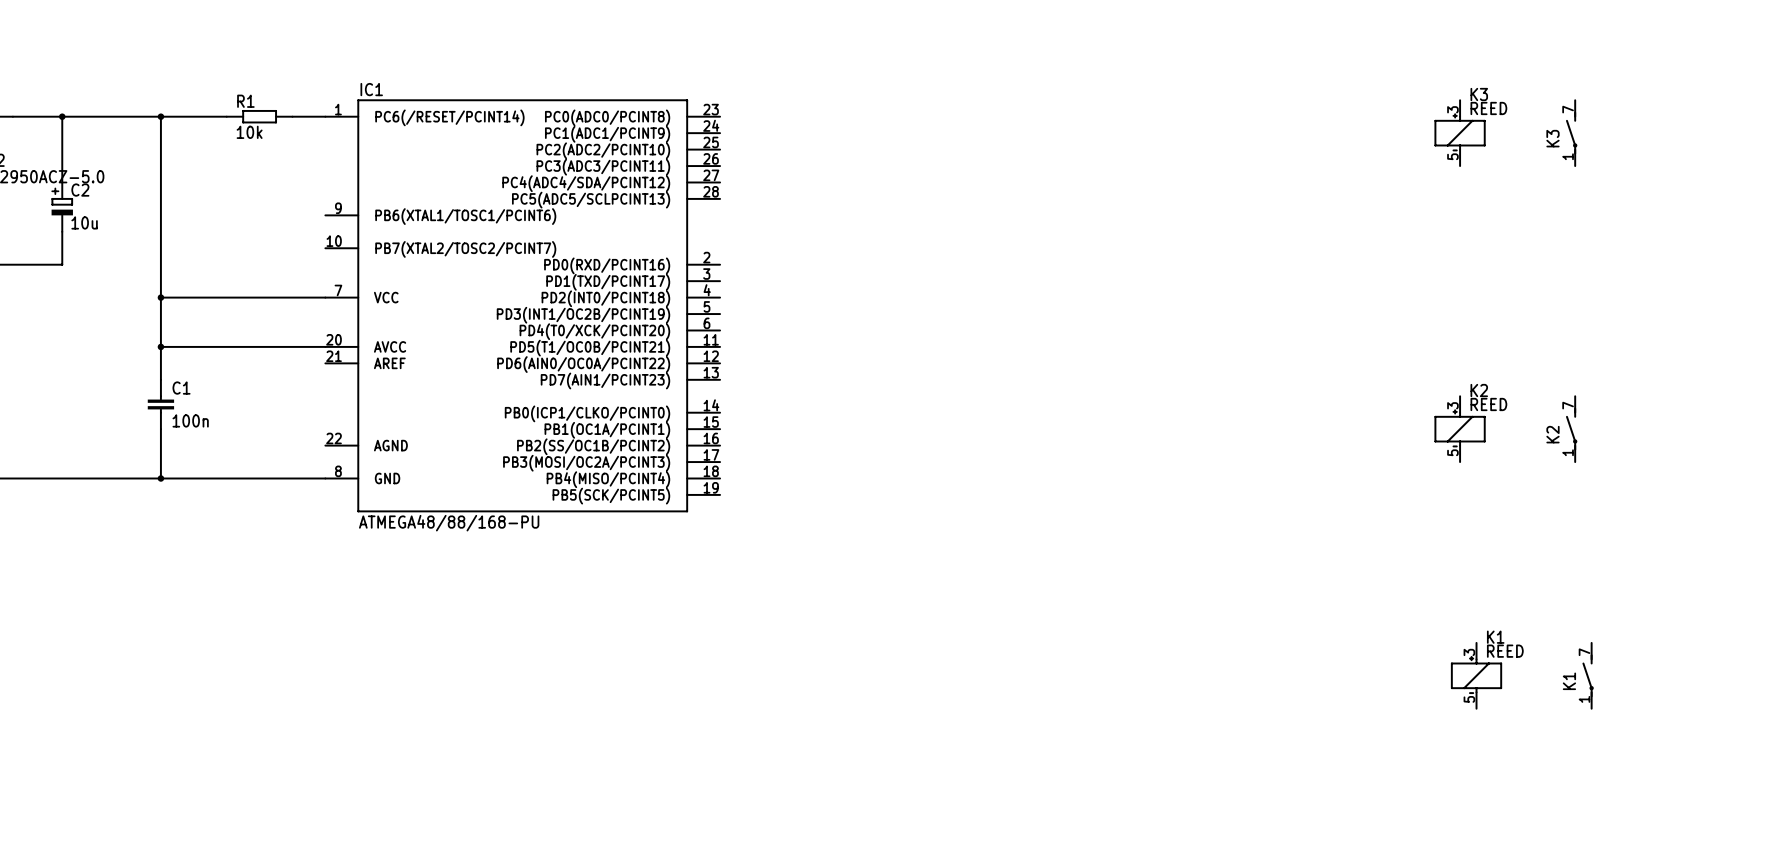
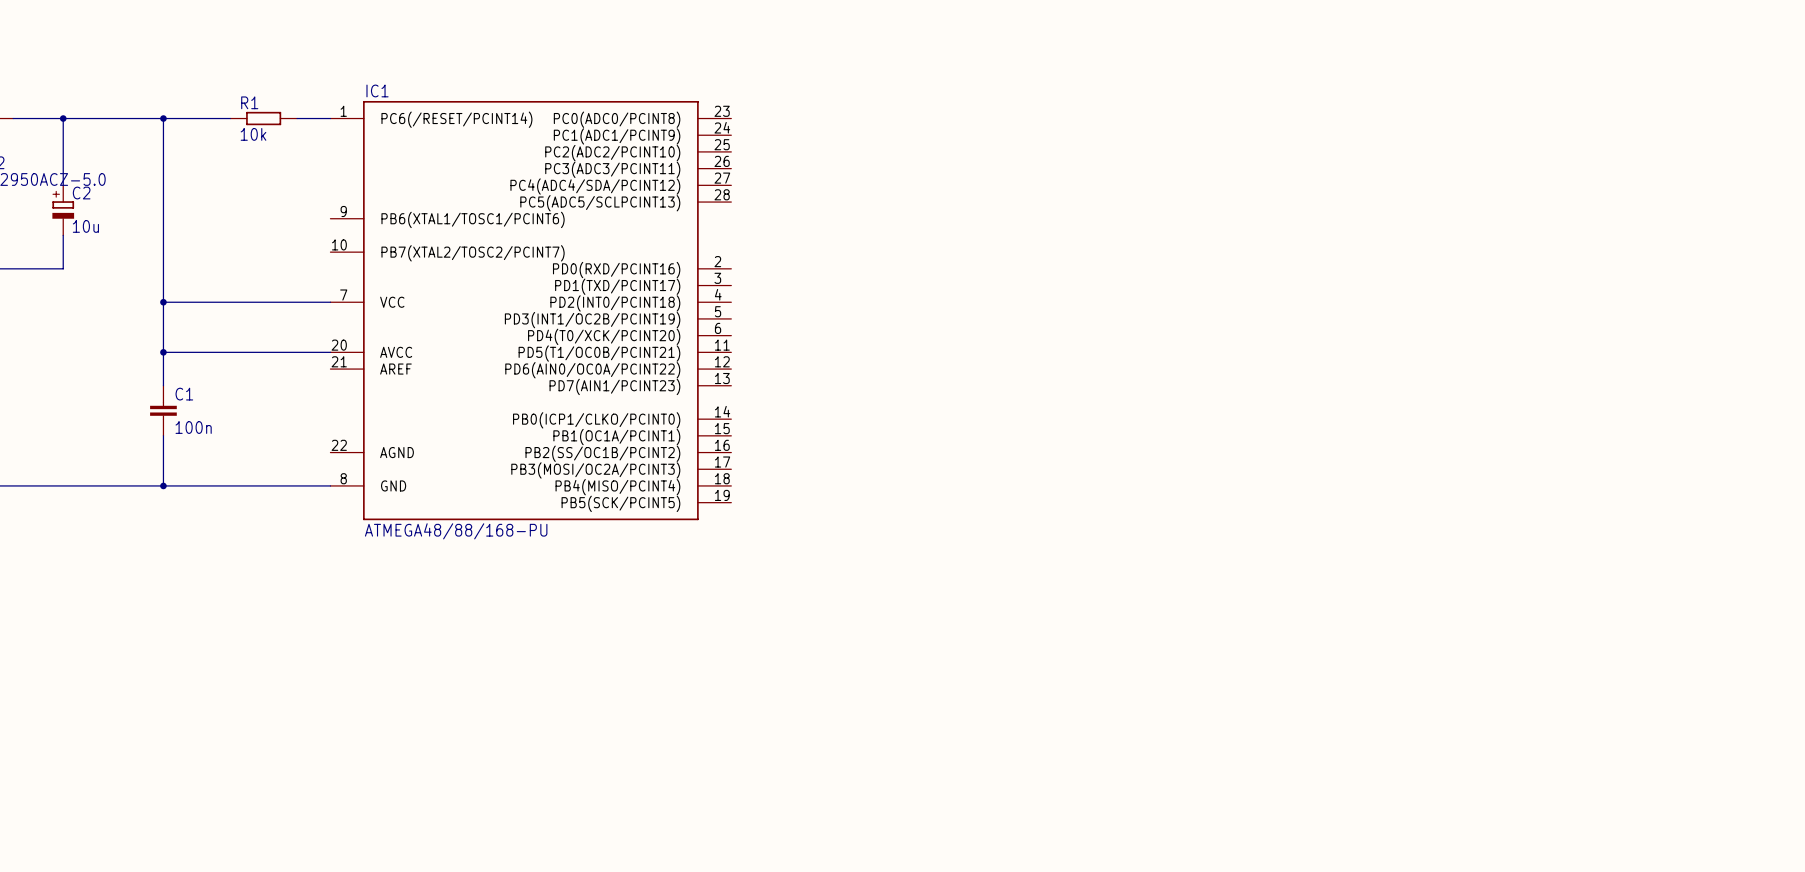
K3: REED (1460, 133) -> none
K3: (1571, 133) -> none
K2: REED (1460, 429) -> none
K2: (1571, 429) -> none
K1: REED (1476, 675) -> none
K1: (1588, 675) -> none

